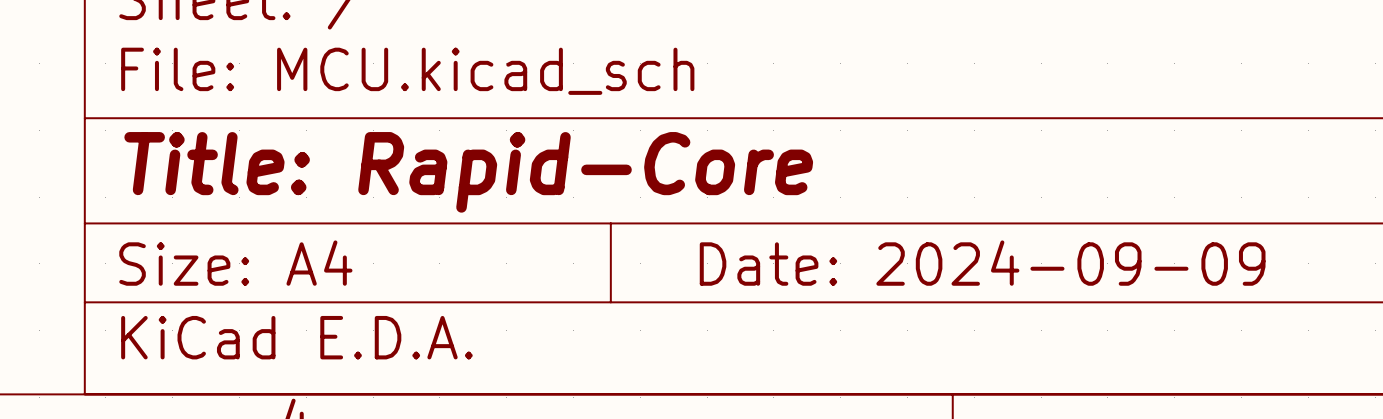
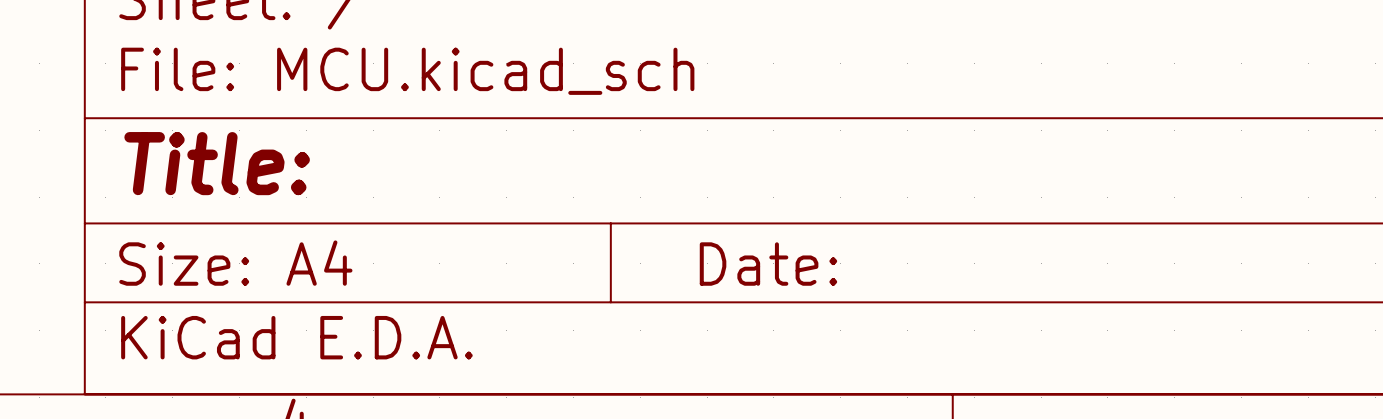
title block: Title: Rapid-Core (468, 172) -> Title: (217, 163)
title block: Date: 2024-09-09 (982, 263) -> Date: (768, 264)

